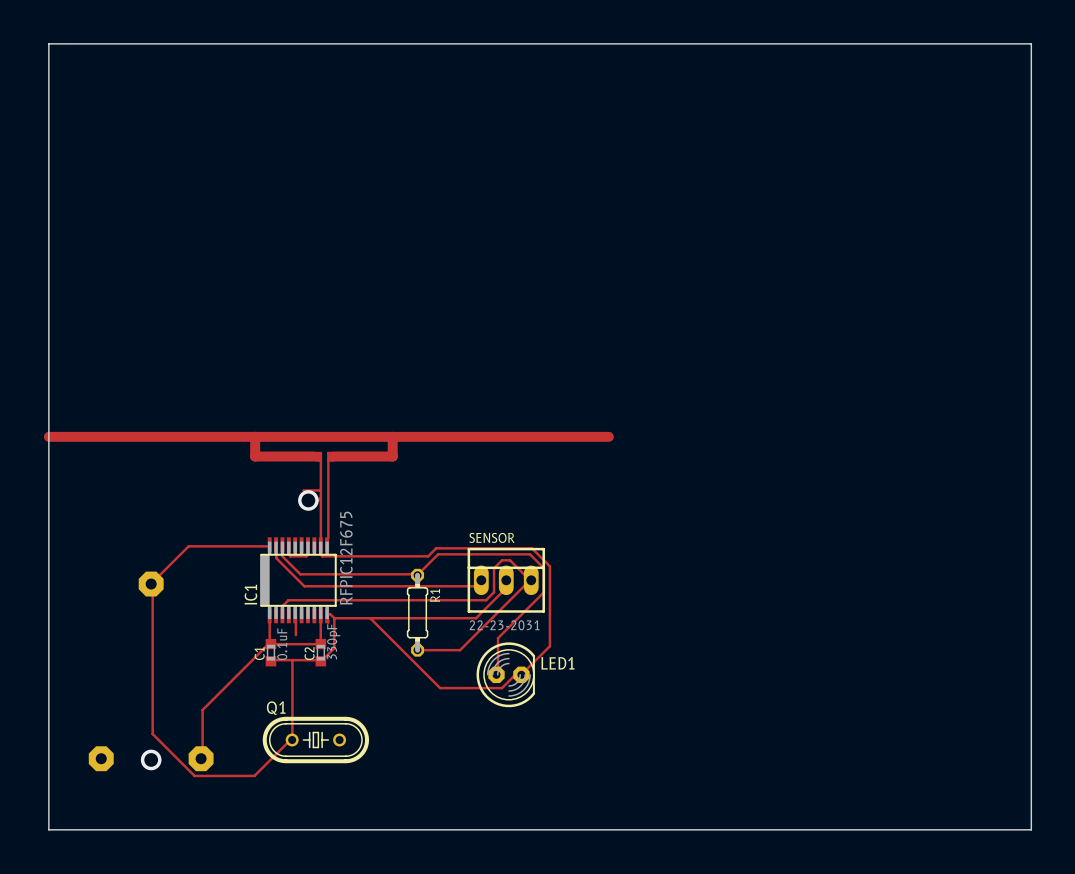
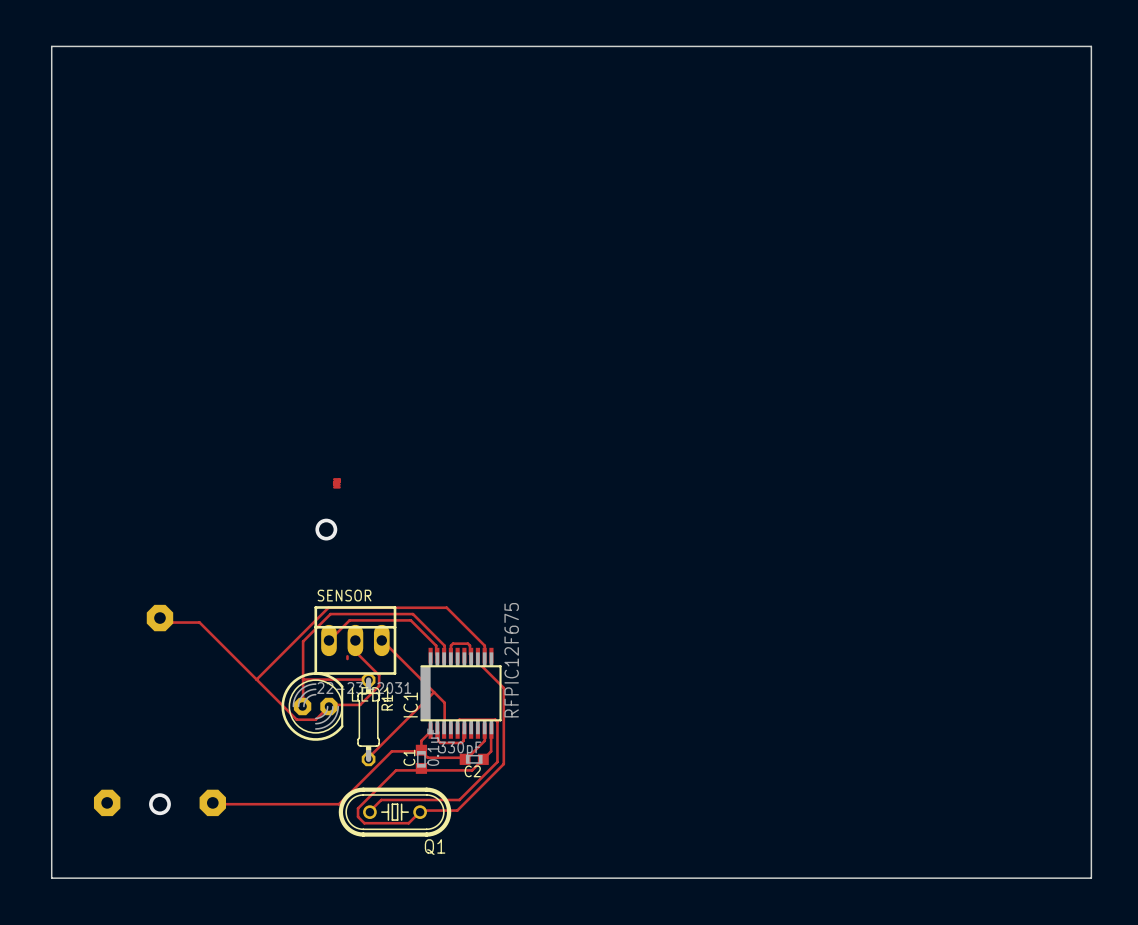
track: (48, 436) (608, 436) -> none
track: (255, 436) (255, 456) (314, 456) -> none
track: (392, 436) (392, 456) (333, 456) -> none
track: (333, 453) (328, 453) (328, 537) -> none
track: (320, 455) (320, 537) -> none
track: (328, 460) (333, 460) -> none
track: (303, 490) (320, 490) -> none
track: (320, 497) (318, 500) -> none
track: (269, 544) (268, 546) (188, 546) (151, 584) (152, 734) (194, 775) (254, 775) (292, 740) (292, 660) -> none
track: (276, 544) (276, 558) (304, 586) (330, 586) -> (328, 640) (349, 620)
track: (282, 544) (282, 556) (300, 574) (310, 574) -> (256, 679) (328, 607)
track: (288, 544) (288, 554) (290, 556) (306, 556) (308, 554) (307, 544) -> none
track: (320, 544) (320, 554) (322, 556) (428, 556) (436, 548) (531, 548) (549, 566) (549, 646) (520, 676) (514, 676) (502, 688) (440, 688) (370, 618) -> none
track: (416, 574) (417, 575) (438, 554) (529, 554) (543, 568) (543, 592) (498, 638) (498, 674) (496, 674) -> (440, 607) (446, 607) (484, 645) (484, 664) (482, 666) (503, 688) (503, 764) (457, 810) (421, 810) (408, 823) (364, 823) (358, 816) (358, 808) (396, 770) (472, 770) (491, 751) (491, 730)
IC1 position: (298, 580) -> (461, 693)
track: (481, 580) (474, 586) (388, 586) -> (437, 655) (436, 645) (410, 620)
track: (506, 580) (506, 588) (476, 618) (334, 618) -> none
SENSOR position: (506, 580) -> (355, 640)
track: (529, 580) (510, 560) (502, 560) (494, 568) (494, 592) (486, 600) (288, 600) (282, 606) (282, 615) -> none
track: (529, 580) (460, 650) (417, 650) -> none
track: none -> (170, 620) (172, 622) (199, 622) (296, 719) (315, 719) (330, 704) (360, 704) (379, 685) (379, 675) (355, 652) (355, 640)
track: none -> (381, 640) (444, 702) (444, 730)
R1 position: (417, 612) -> (368, 719)
track: (269, 615) (270, 644) -> none
track: (295, 615) (295, 635) -> none
track: (320, 615) (320, 644) -> none
track: (327, 615) (330, 614) (334, 618) -> none
track: (334, 618) (334, 648) (320, 661) (270, 661) -> none
track: none -> (444, 655) (444, 645) (412, 614) (330, 614) (303, 641) (302, 706)
track: none -> (450, 655) (450, 645) (453, 643) (467, 643) (471, 655)
C2 value position: 330pF (333, 641) -> 330pF (460, 749)
track: none -> (303, 679) (368, 680)
track: (270, 644) (320, 644) -> none
track: (270, 644) (268, 644) (202, 710) (201, 758) -> none
C1 position: (270, 652) -> (421, 759)
C2 rotation: 0° (320, 652) -> 90° clockwise (474, 759)
C2 position: (320, 652) -> (474, 759)
track: none -> (434, 692) (368, 759)
LED1 position: (505, 674) -> (312, 706)
track: none -> (430, 730) (421, 740) (421, 751)
track: none -> (437, 730) (438, 740) (440, 742) (461, 742) (463, 740) (464, 730)
track: none -> (457, 730) (457, 721) (459, 719) (495, 719) (497, 721) (497, 761) (459, 799) (381, 799) (369, 812)
track: none -> (484, 730) (484, 740) (465, 759) (463, 757) (427, 757) (421, 751)
Q1 name position: Q1 (276, 708) -> Q1 (435, 847)
track: none -> (421, 751) (391, 751) (339, 804) (223, 805)
Q1 position: (315, 740) -> (395, 812)

